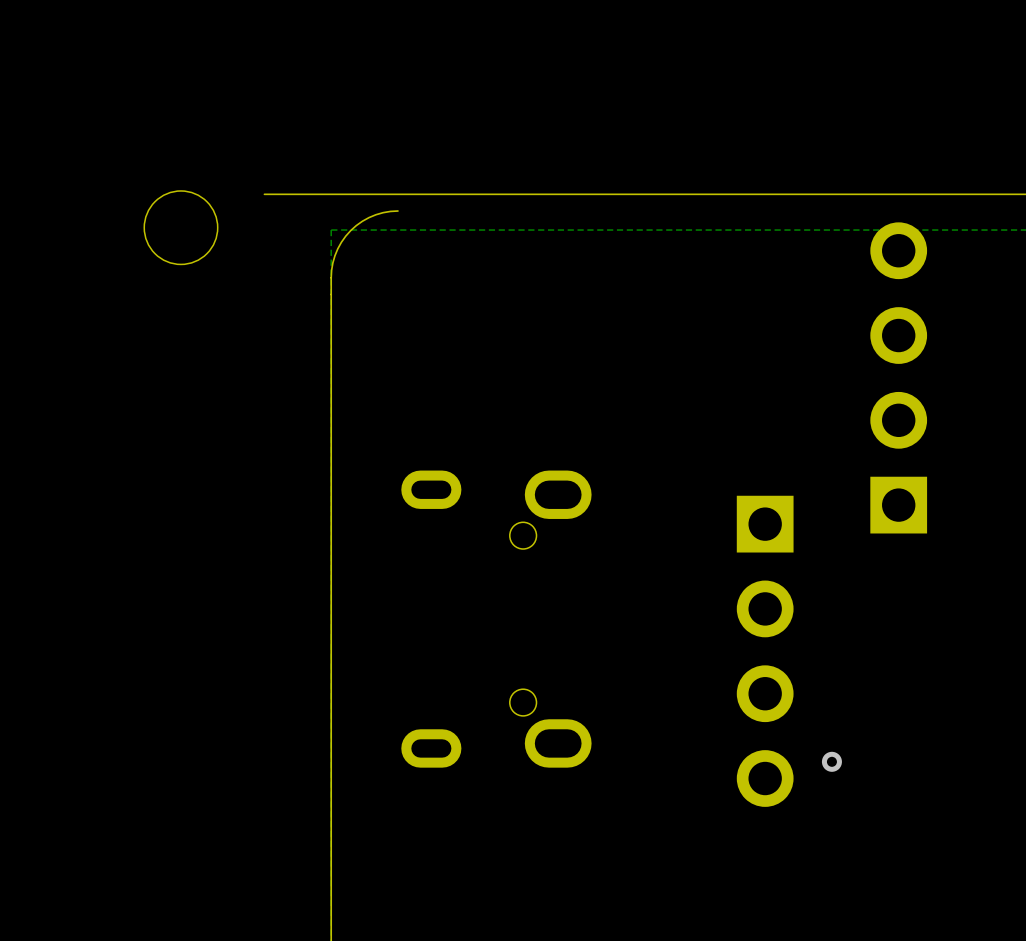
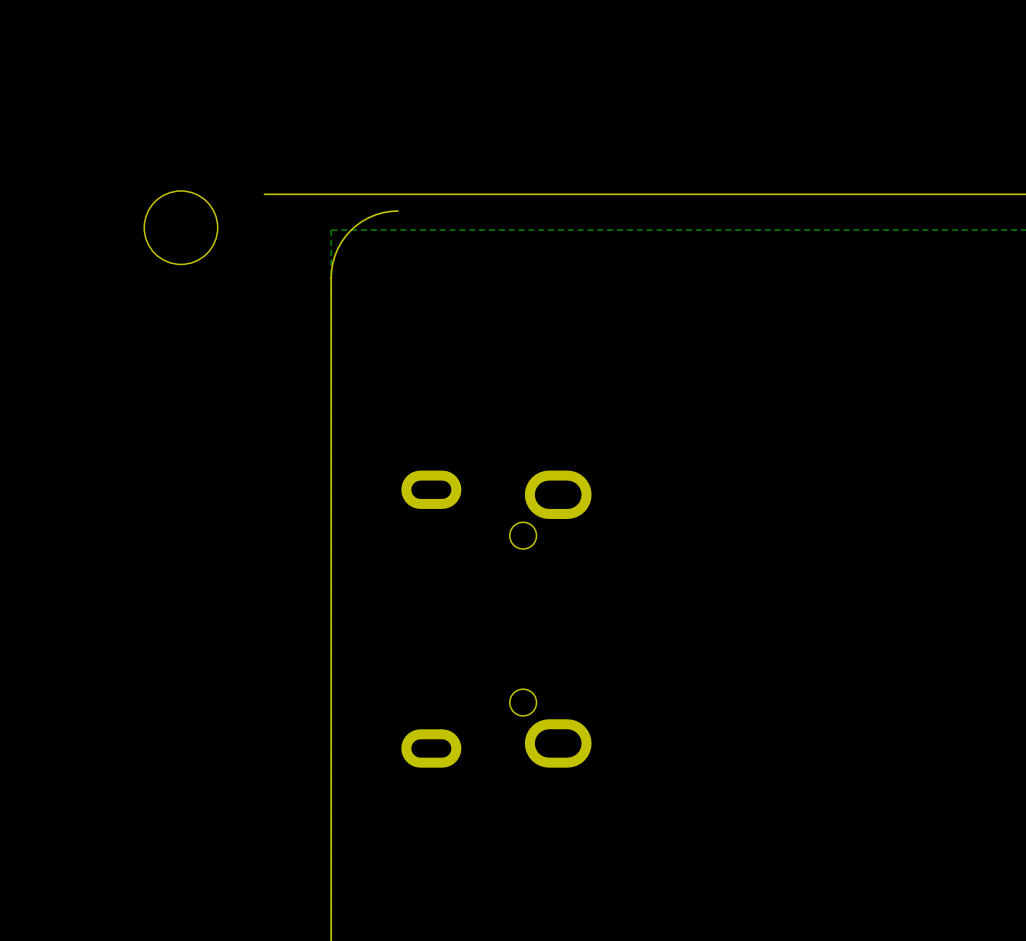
part: (898, 377) -> none
part: (765, 651) -> none
via: (831, 761) -> none

